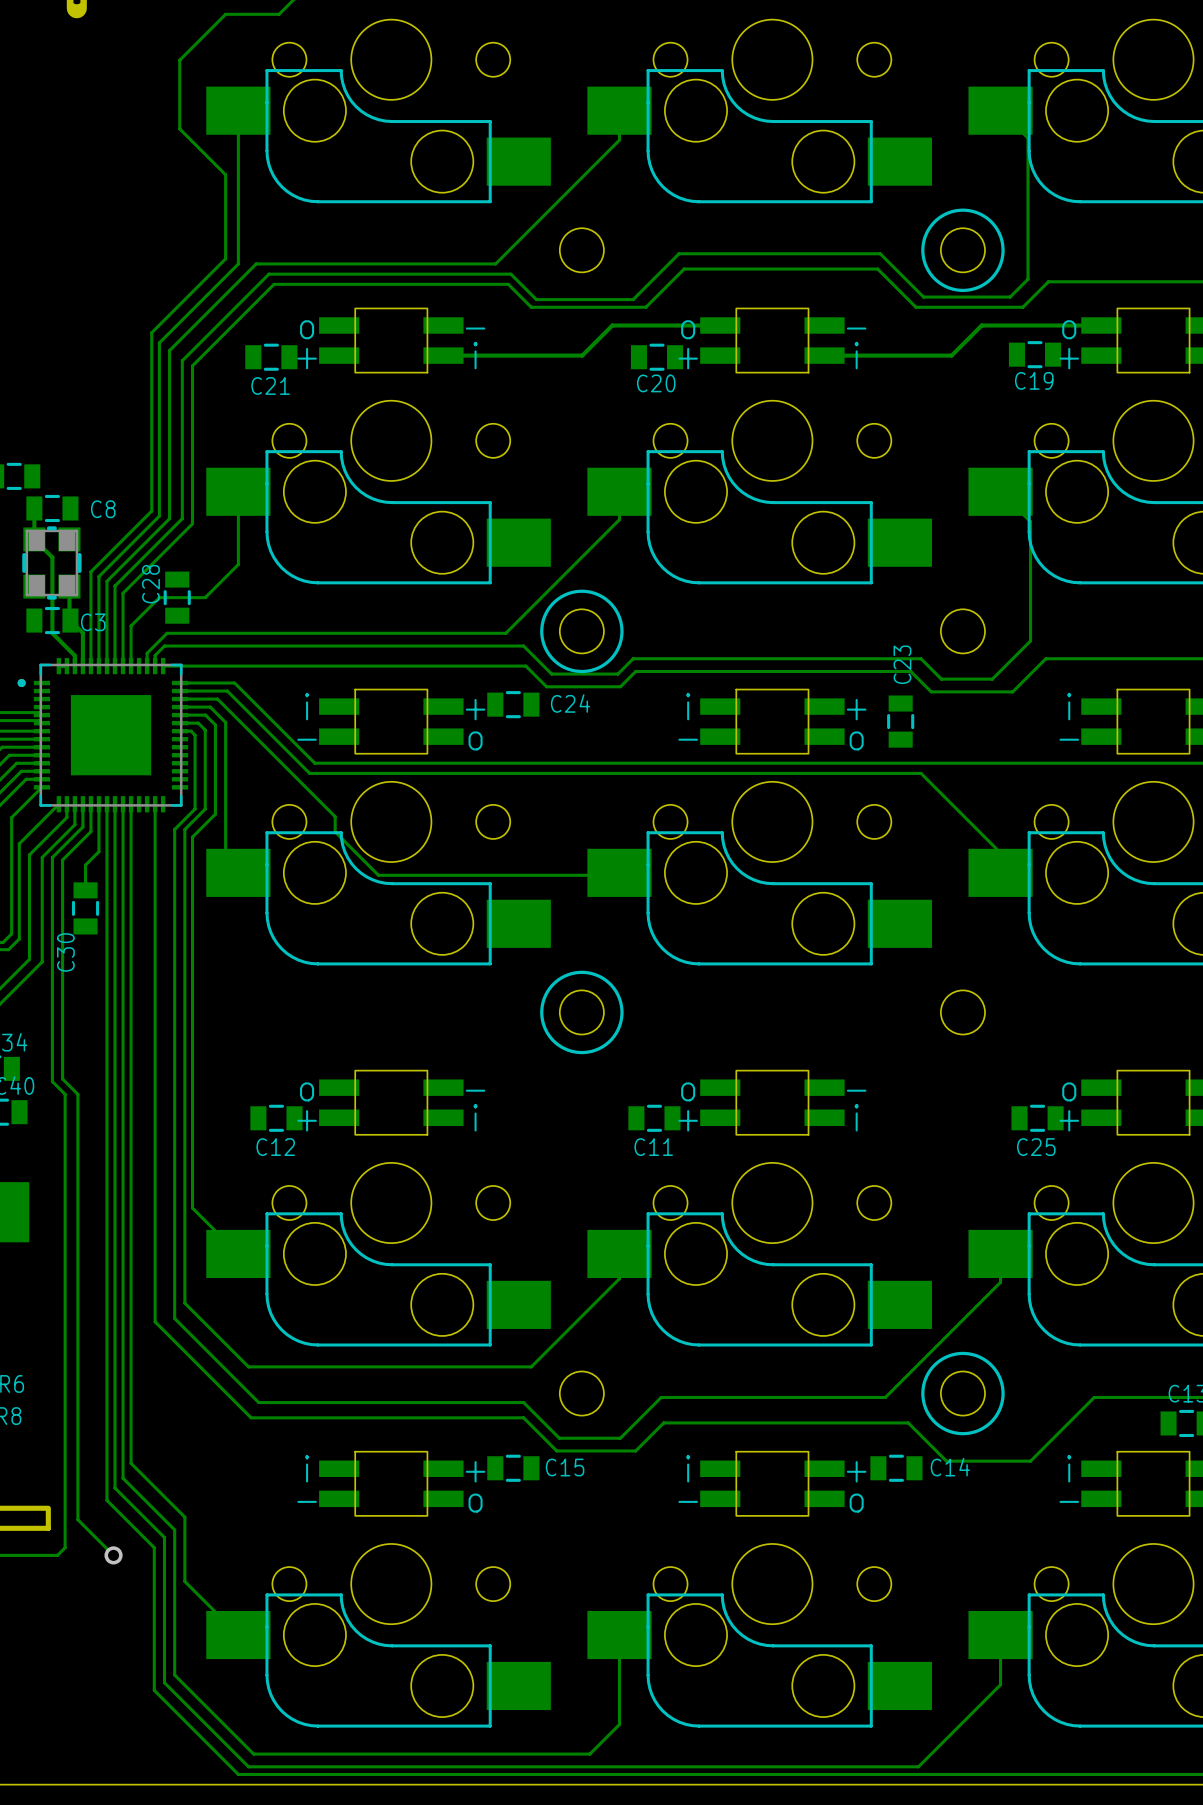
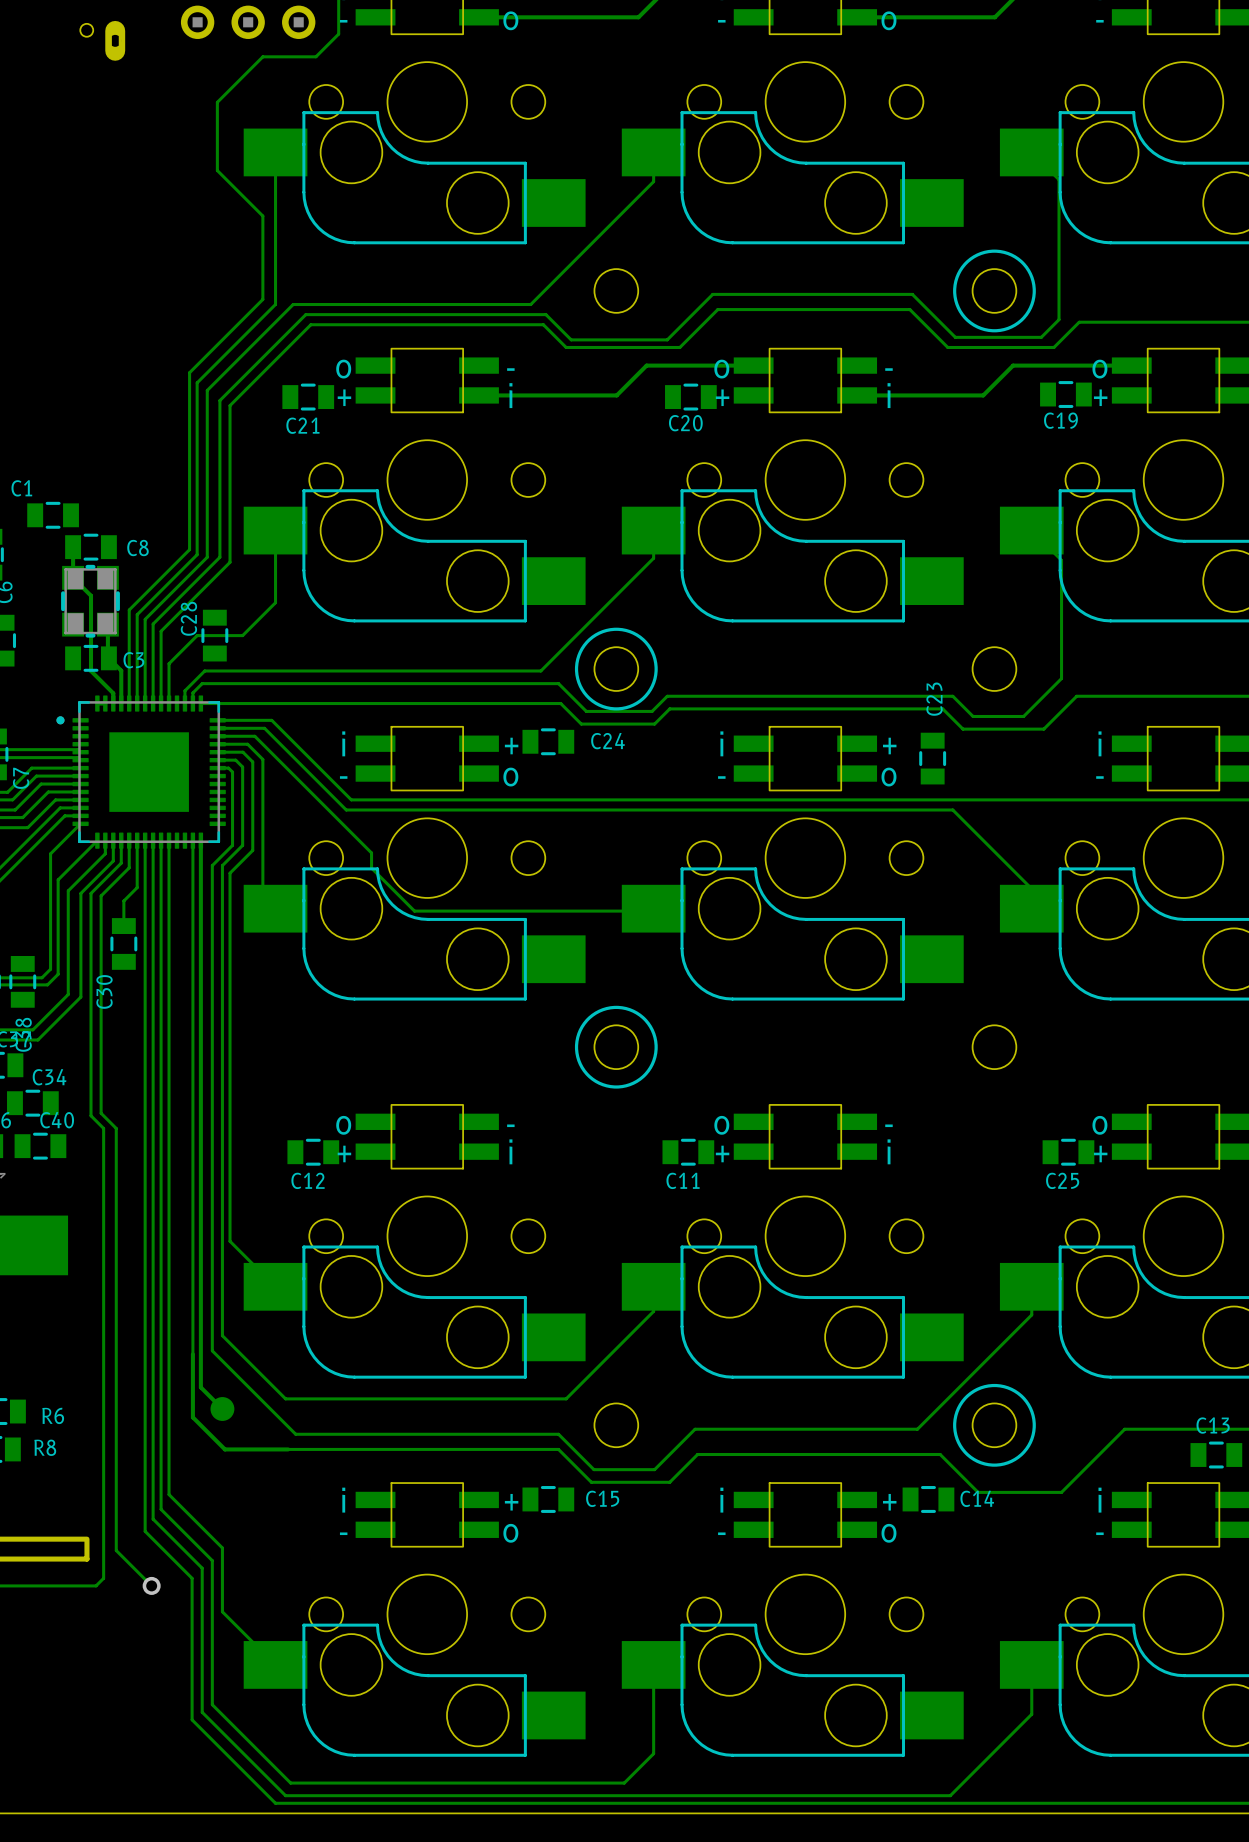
track: none -> (200, 840) (200, 1387) (222, 1409)
track: (155, 1321) (251, 1417) -> (192, 1354) (192, 1417) (224, 1449) (288, 1449)
part: none -> (222, 1409)

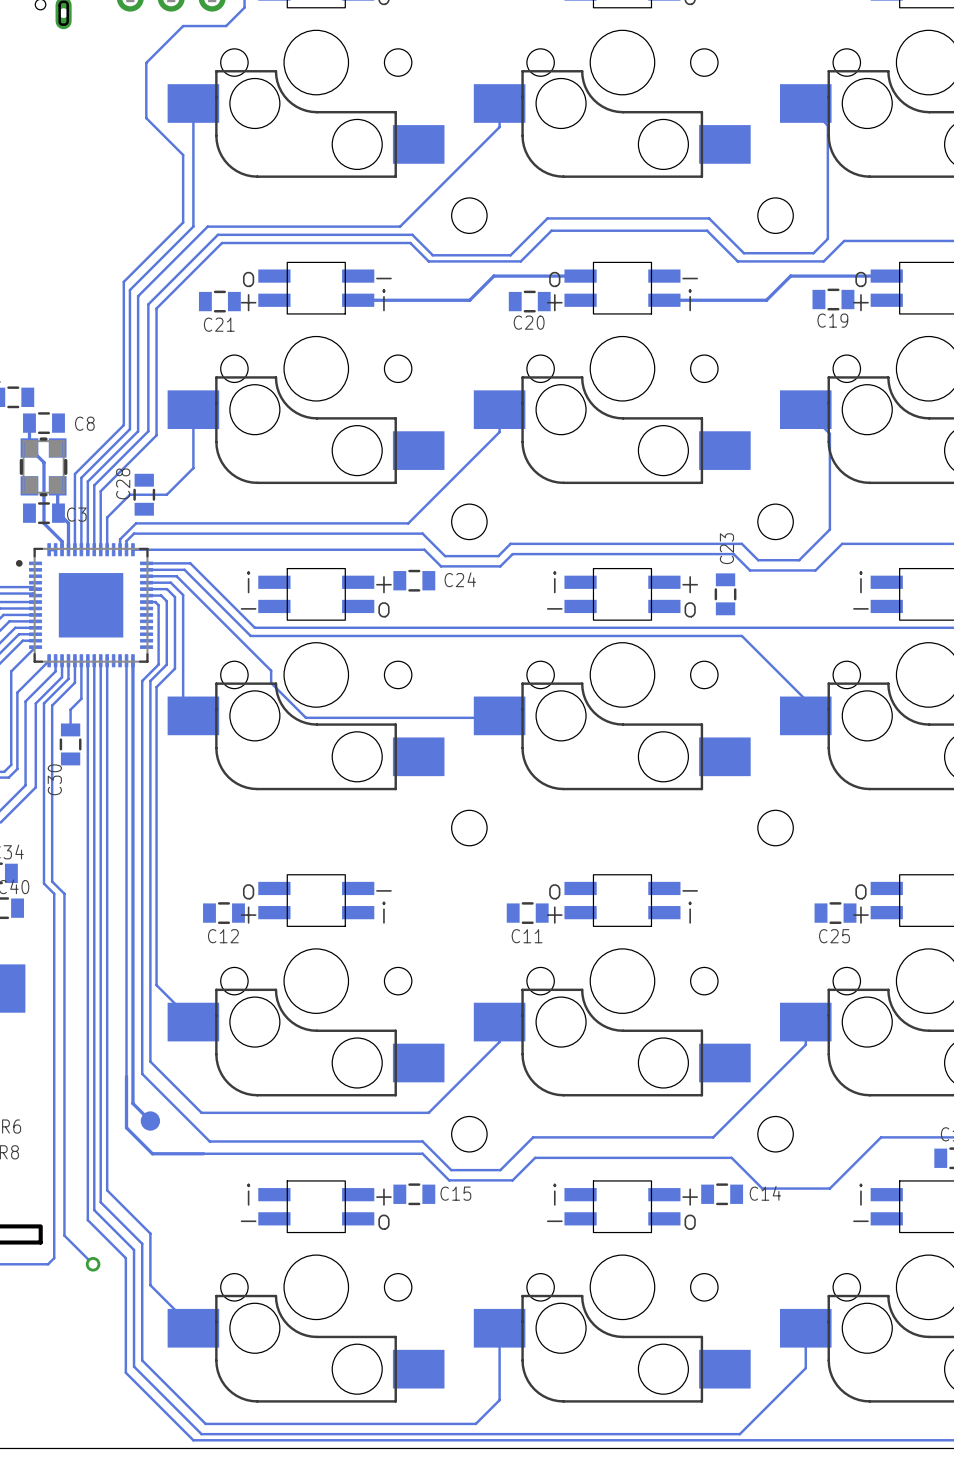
drawing: [953, 249, 1036, 333] -> none
drawing: [574, 627, 658, 711] -> none
drawing: [574, 1005, 658, 1089] -> none
drawing: [953, 1383, 1036, 1467] -> none

